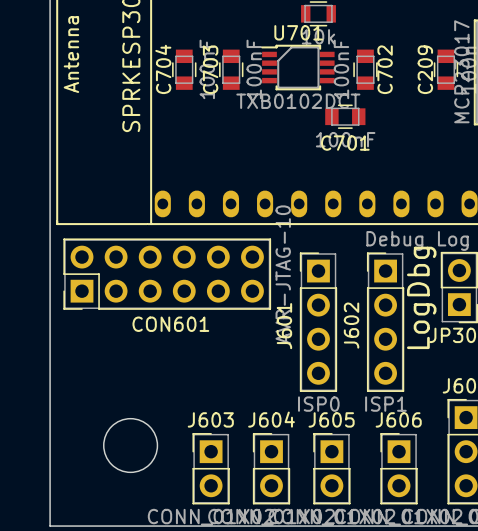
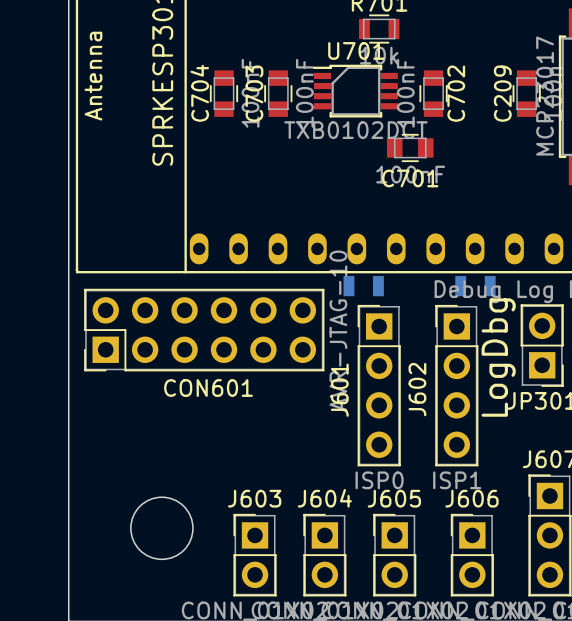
part: none -> (363, 286)
part: none -> (475, 286)

